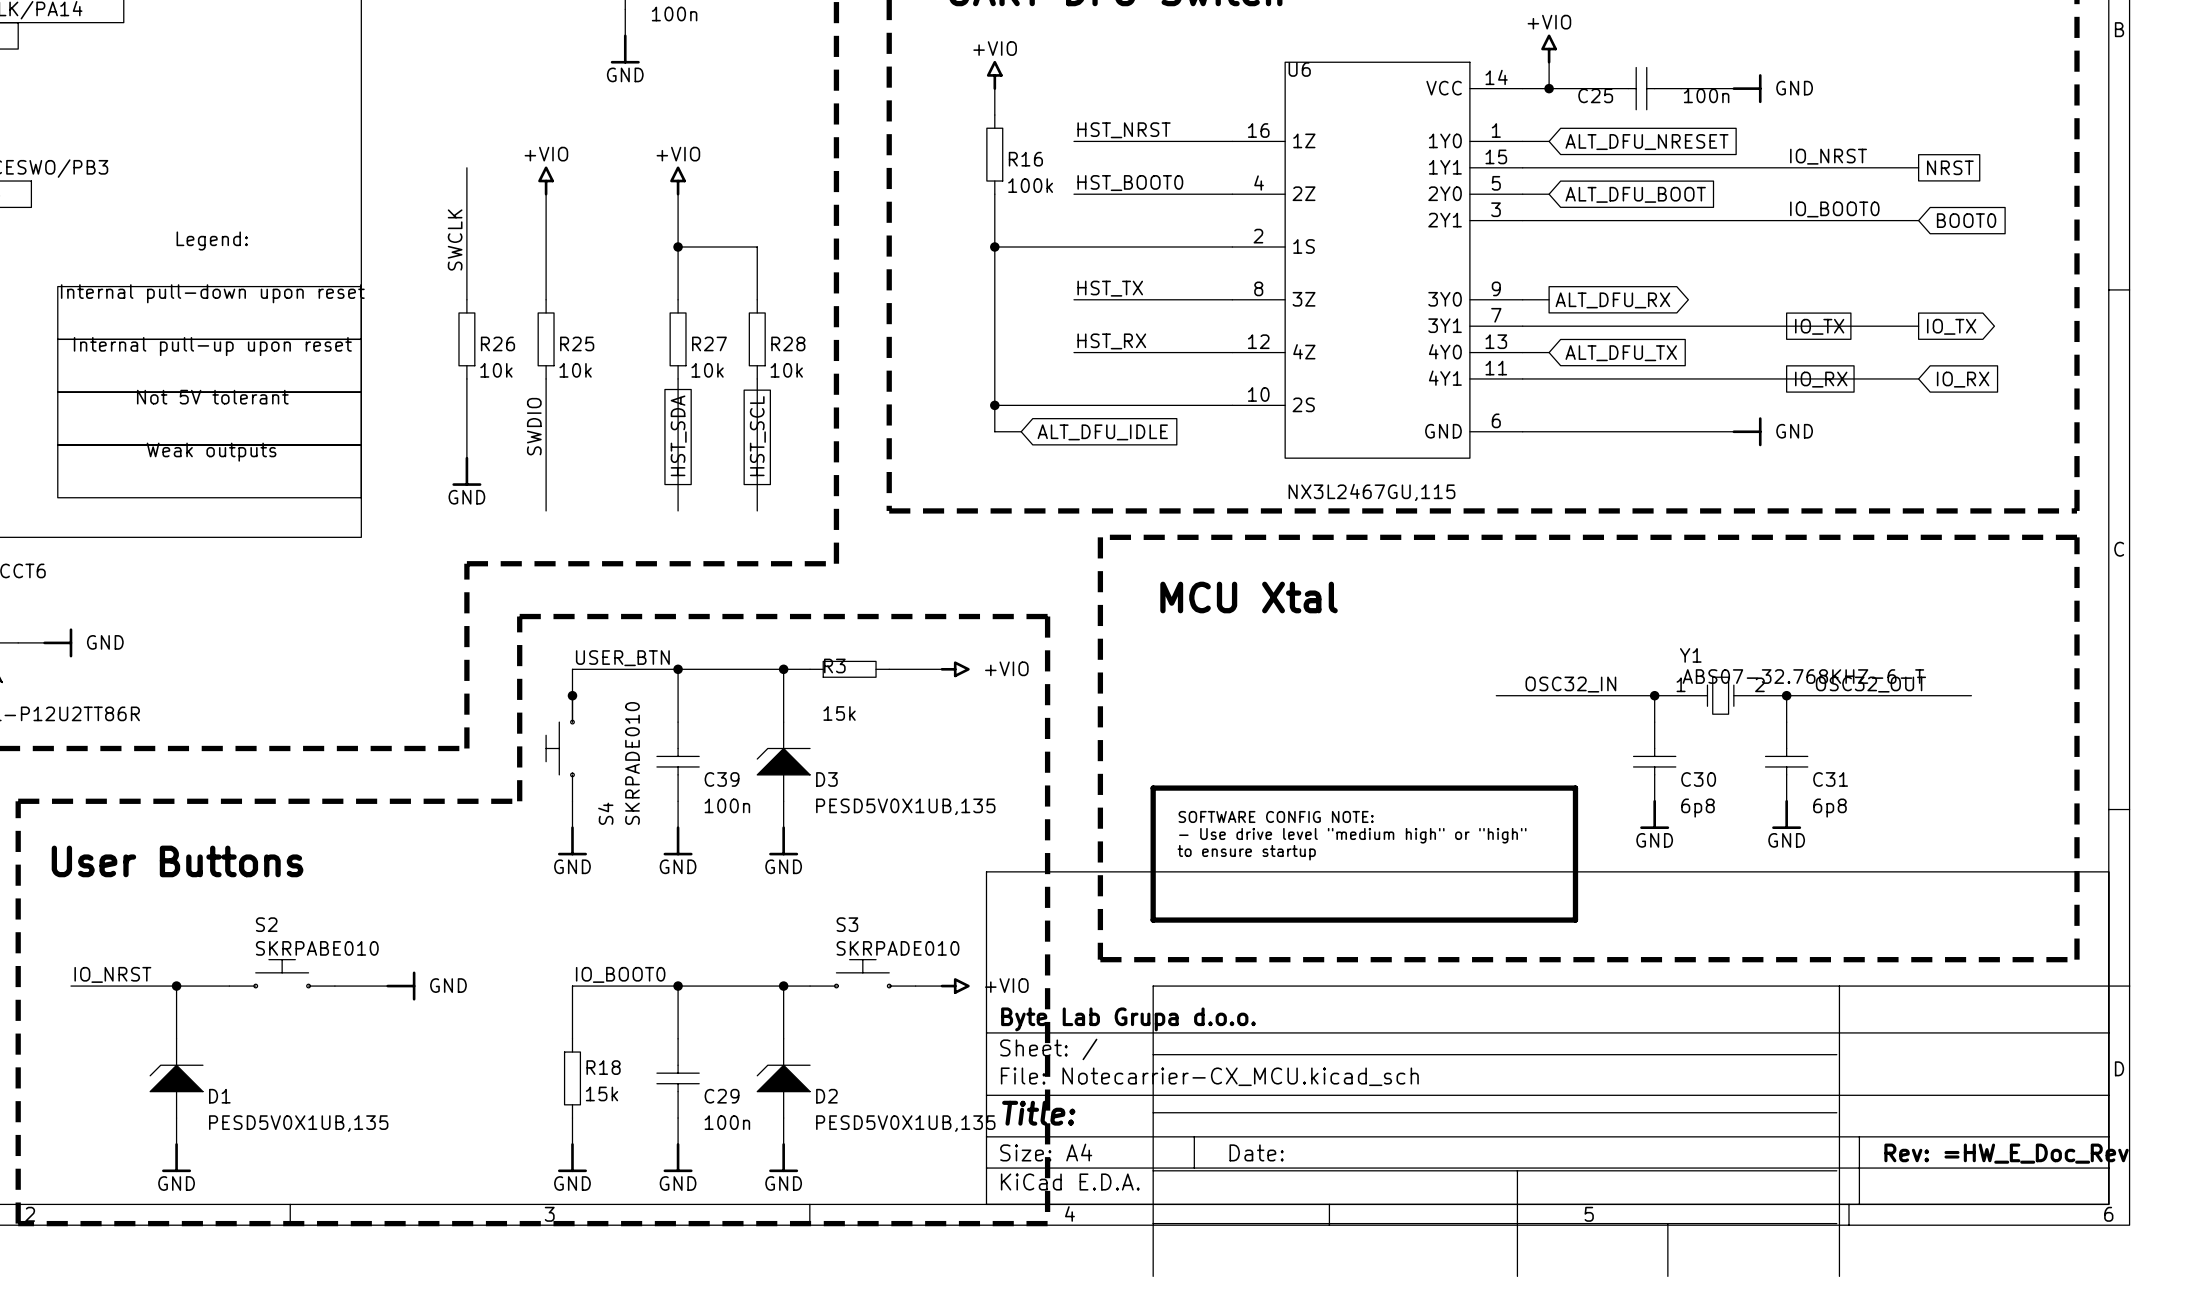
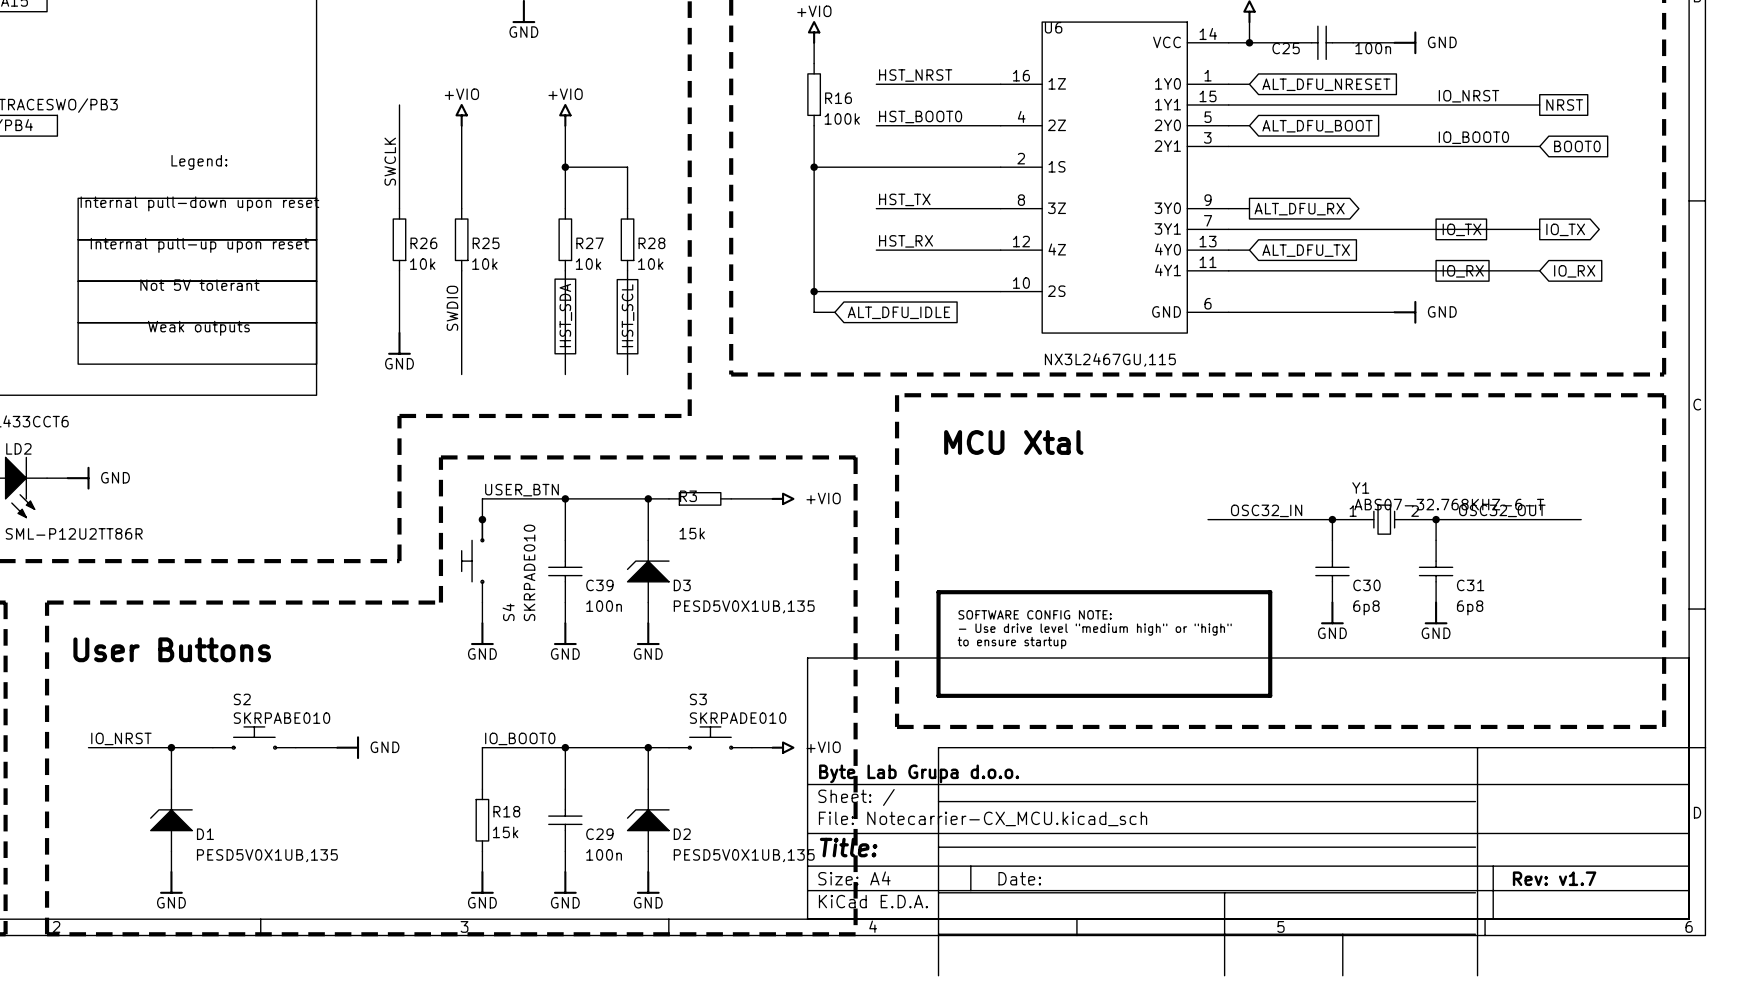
title block: Rev: =HW_E_Doc_Rev (2006, 1153) -> Rev: v1.7 (1554, 878)

